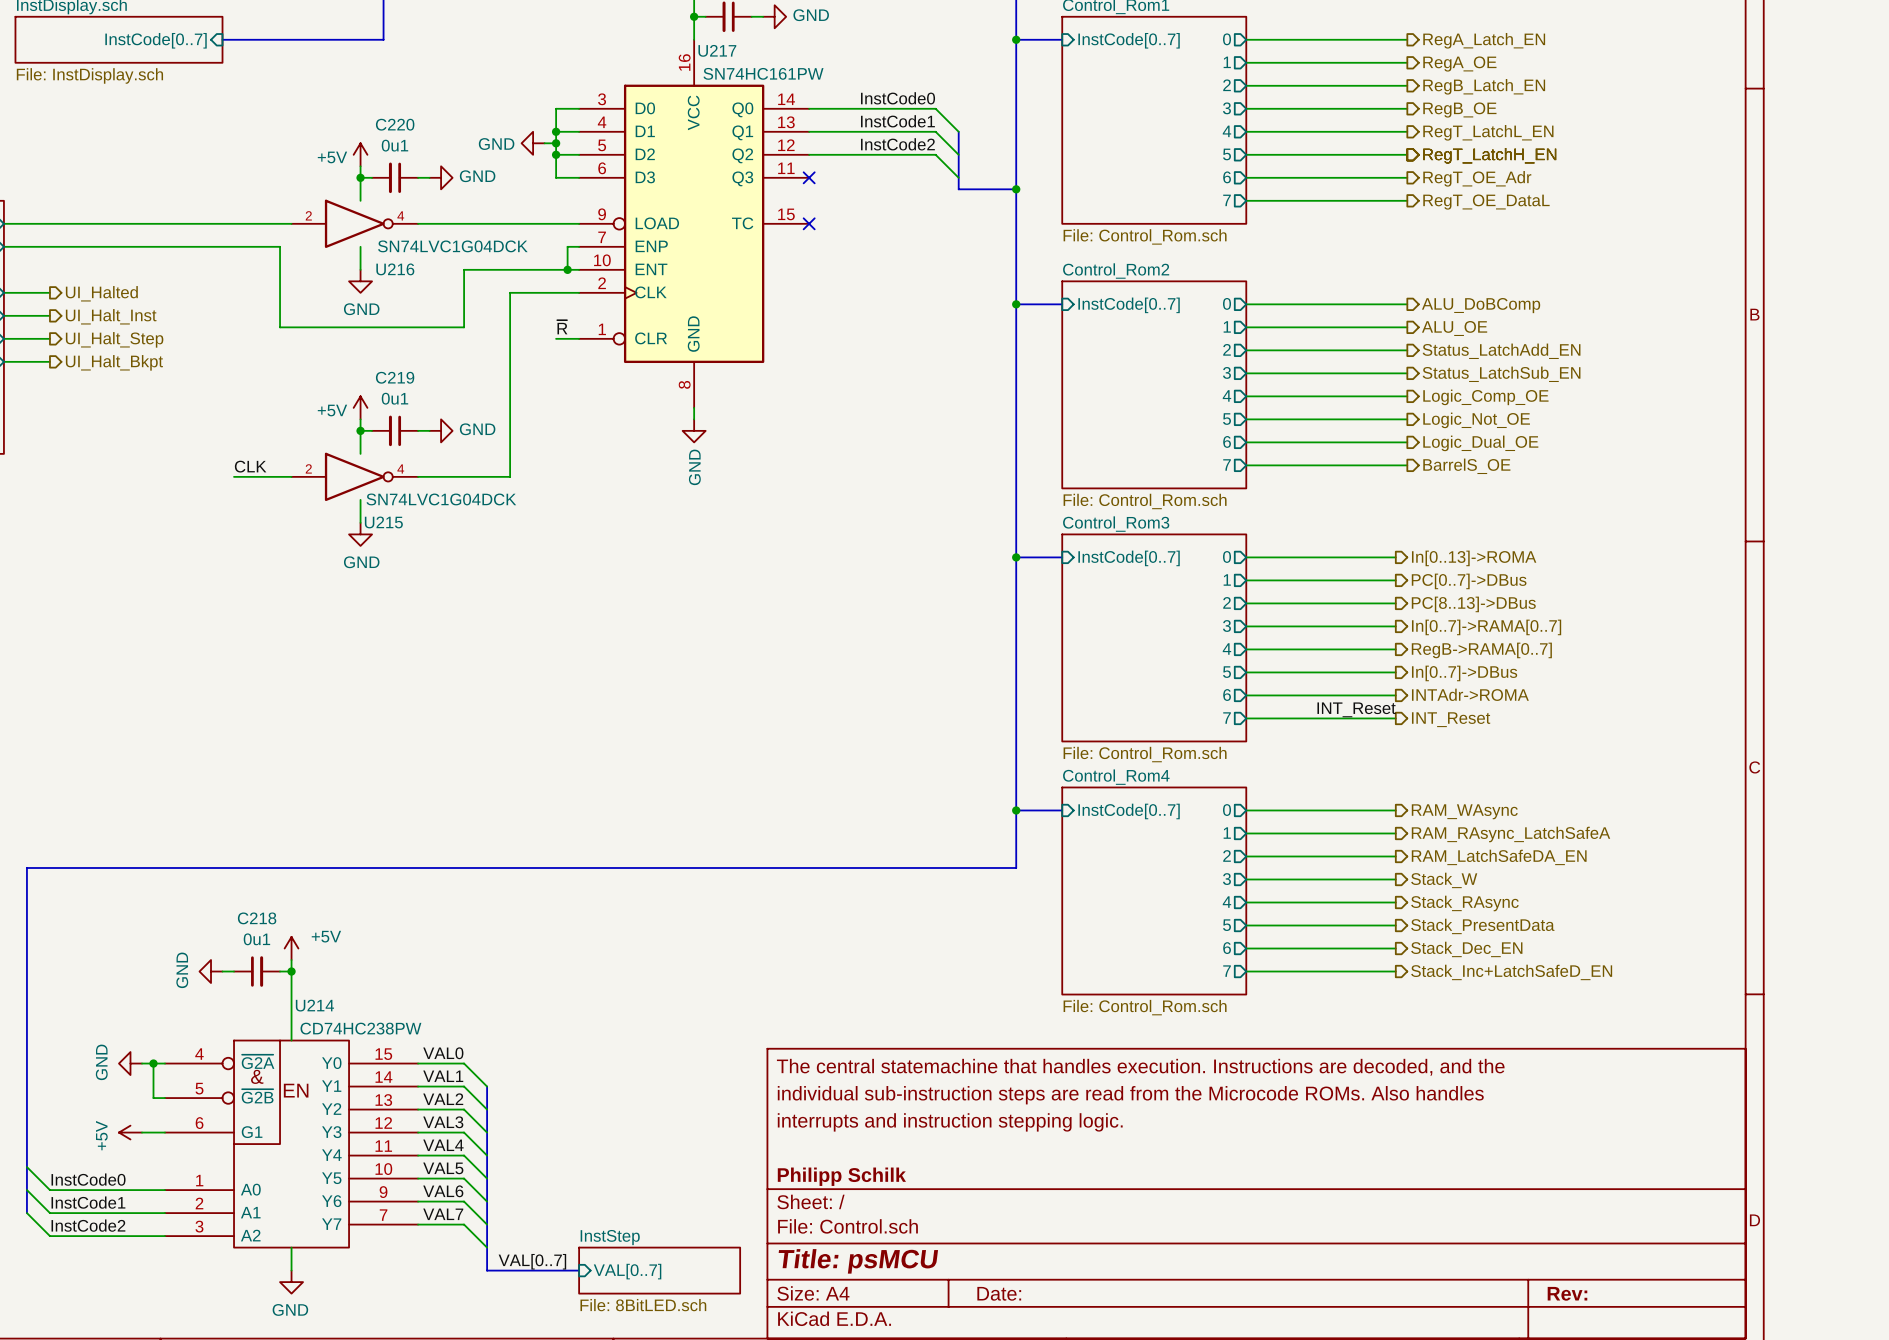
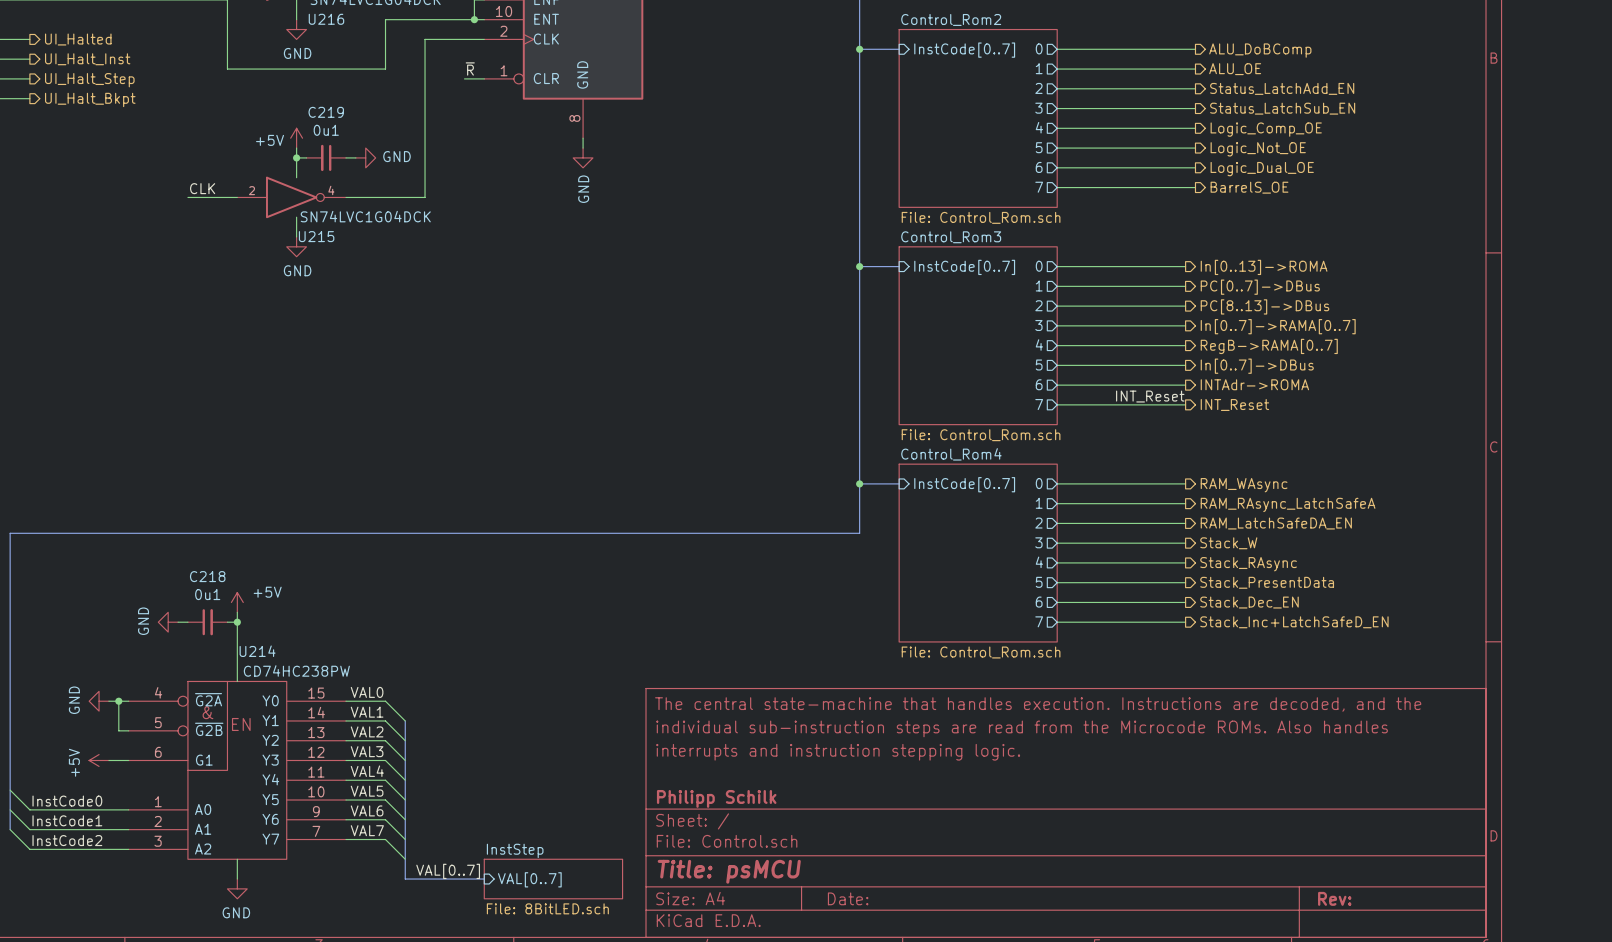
title block: The central statemachine that handles execution. Instructions are decoded, and the (1140, 1067) -> The central state-machine that handles execution. Instructions are decoded, and the (1038, 704)

